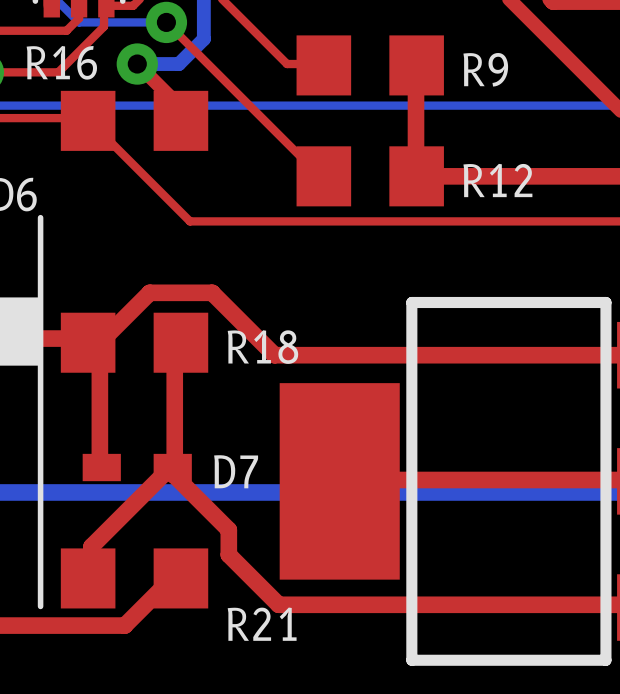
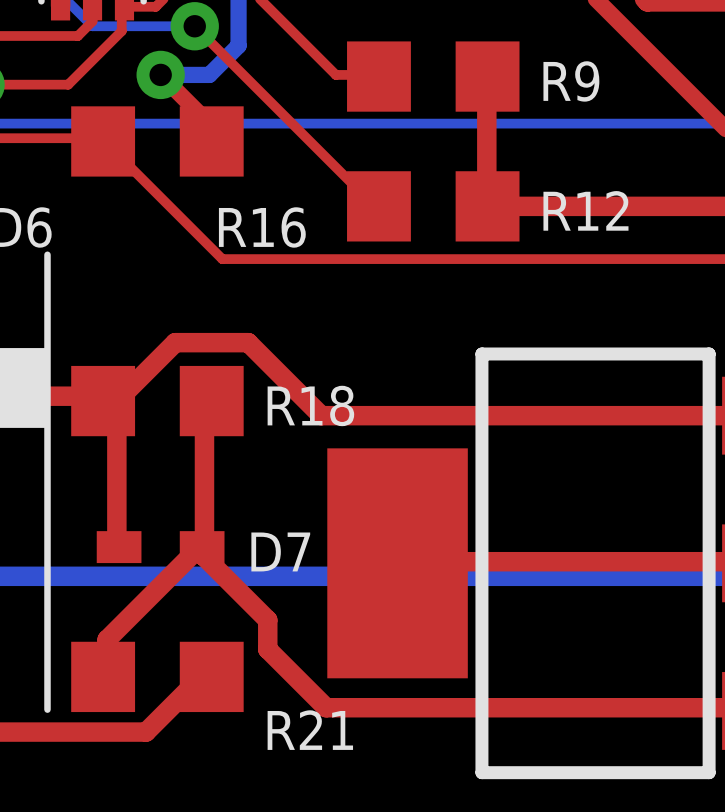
R16 name position: R16 (61, 62) -> R16 (262, 227)

